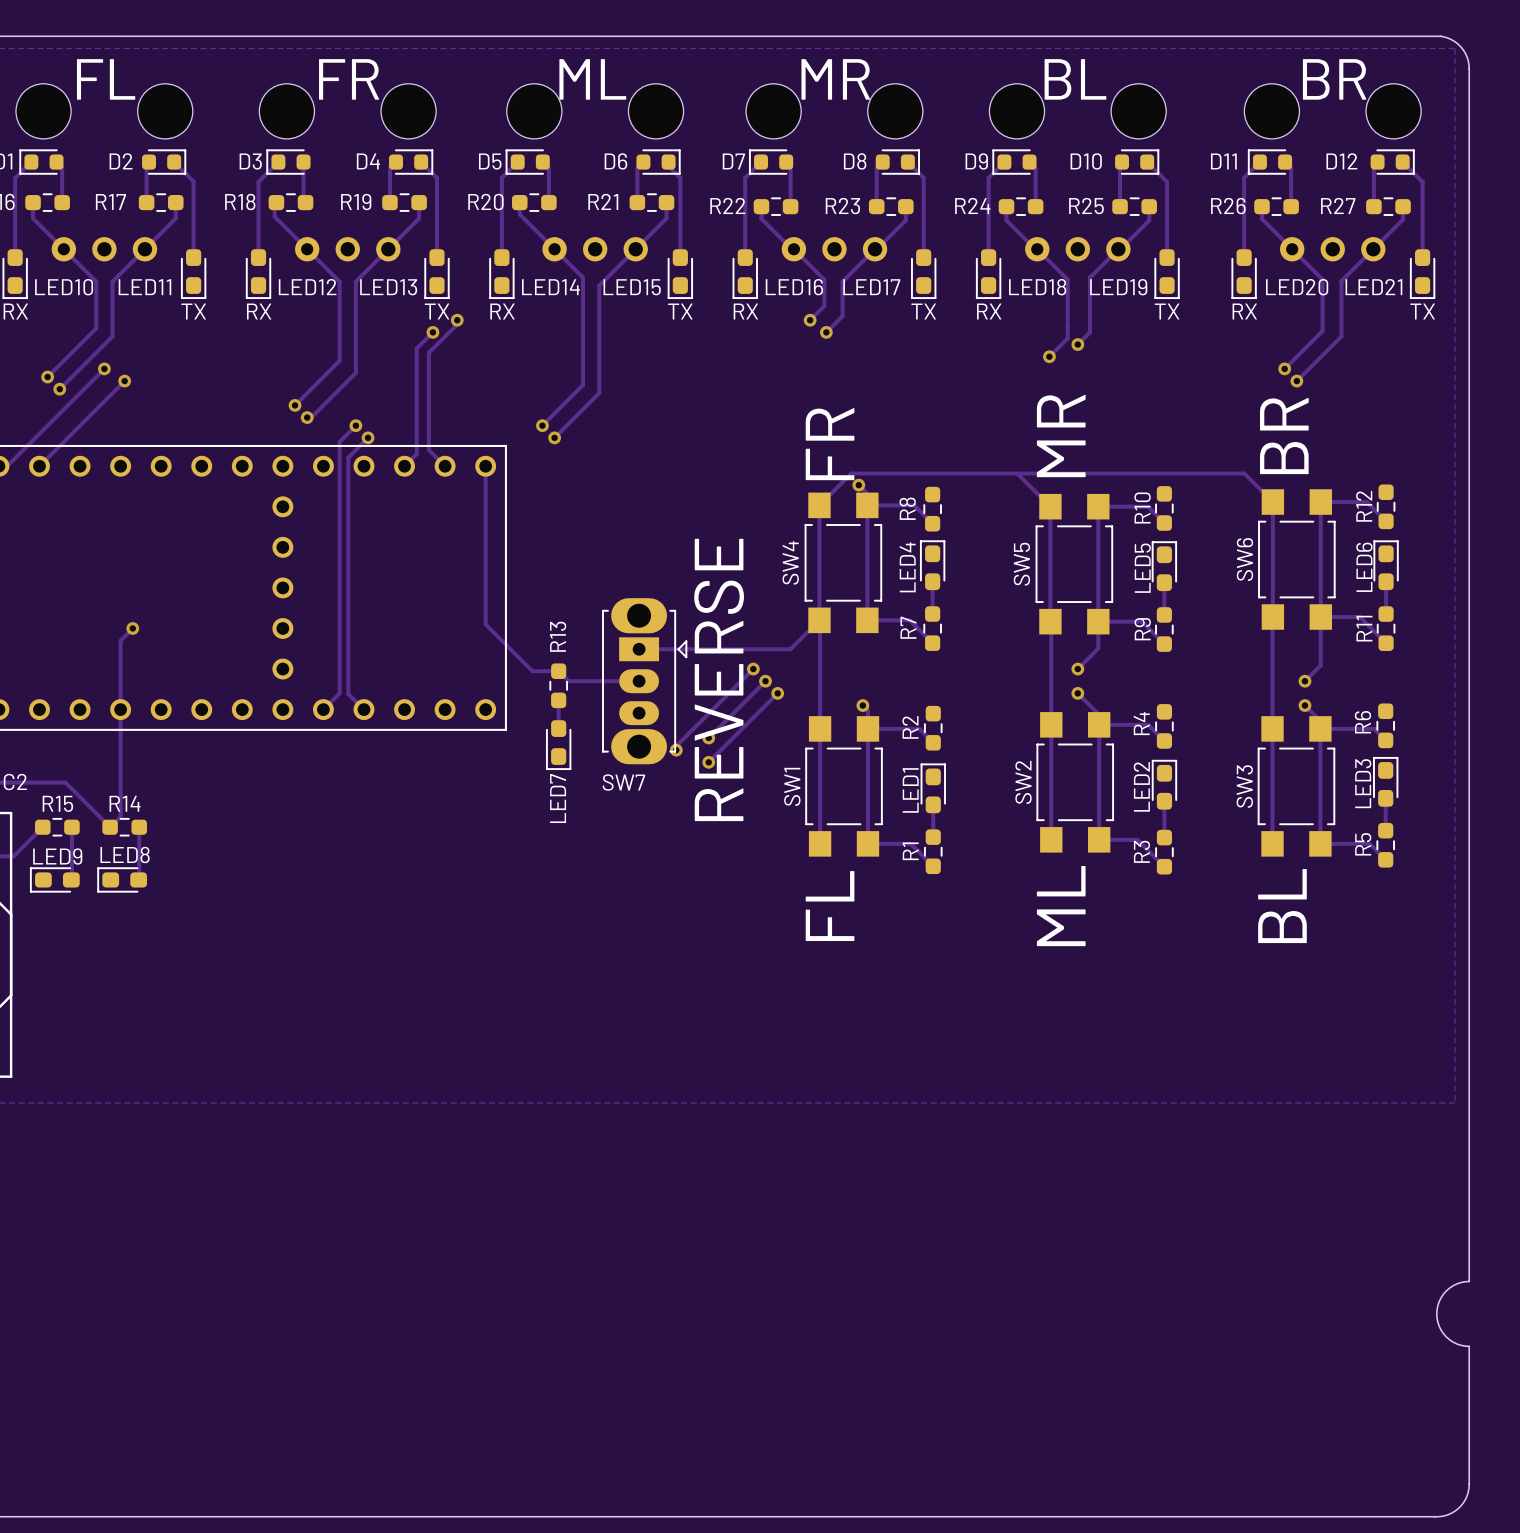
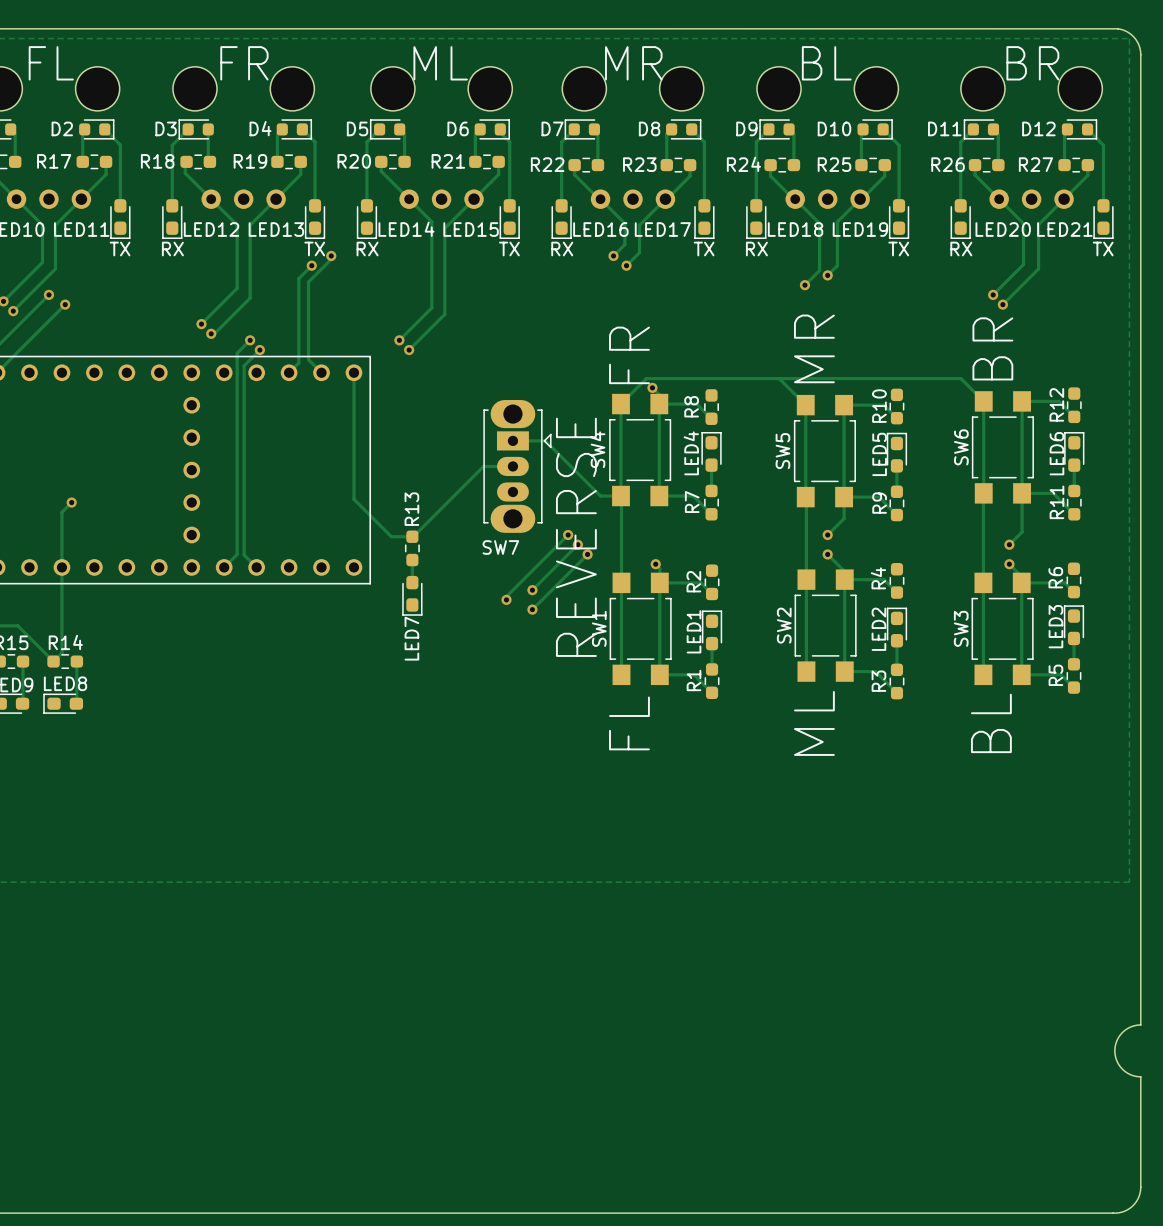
track: (819, 620) (790, 649) (639, 649) -> (621, 496) (600, 496) (545, 440) (512, 440)
track: (558, 671) (568, 681) (639, 681) -> (412, 536) (483, 466) (512, 466)
text position: REVERSE (719, 679) -> REVERSE (576, 537)
SW7 position: (644, 681) -> (517, 466)

